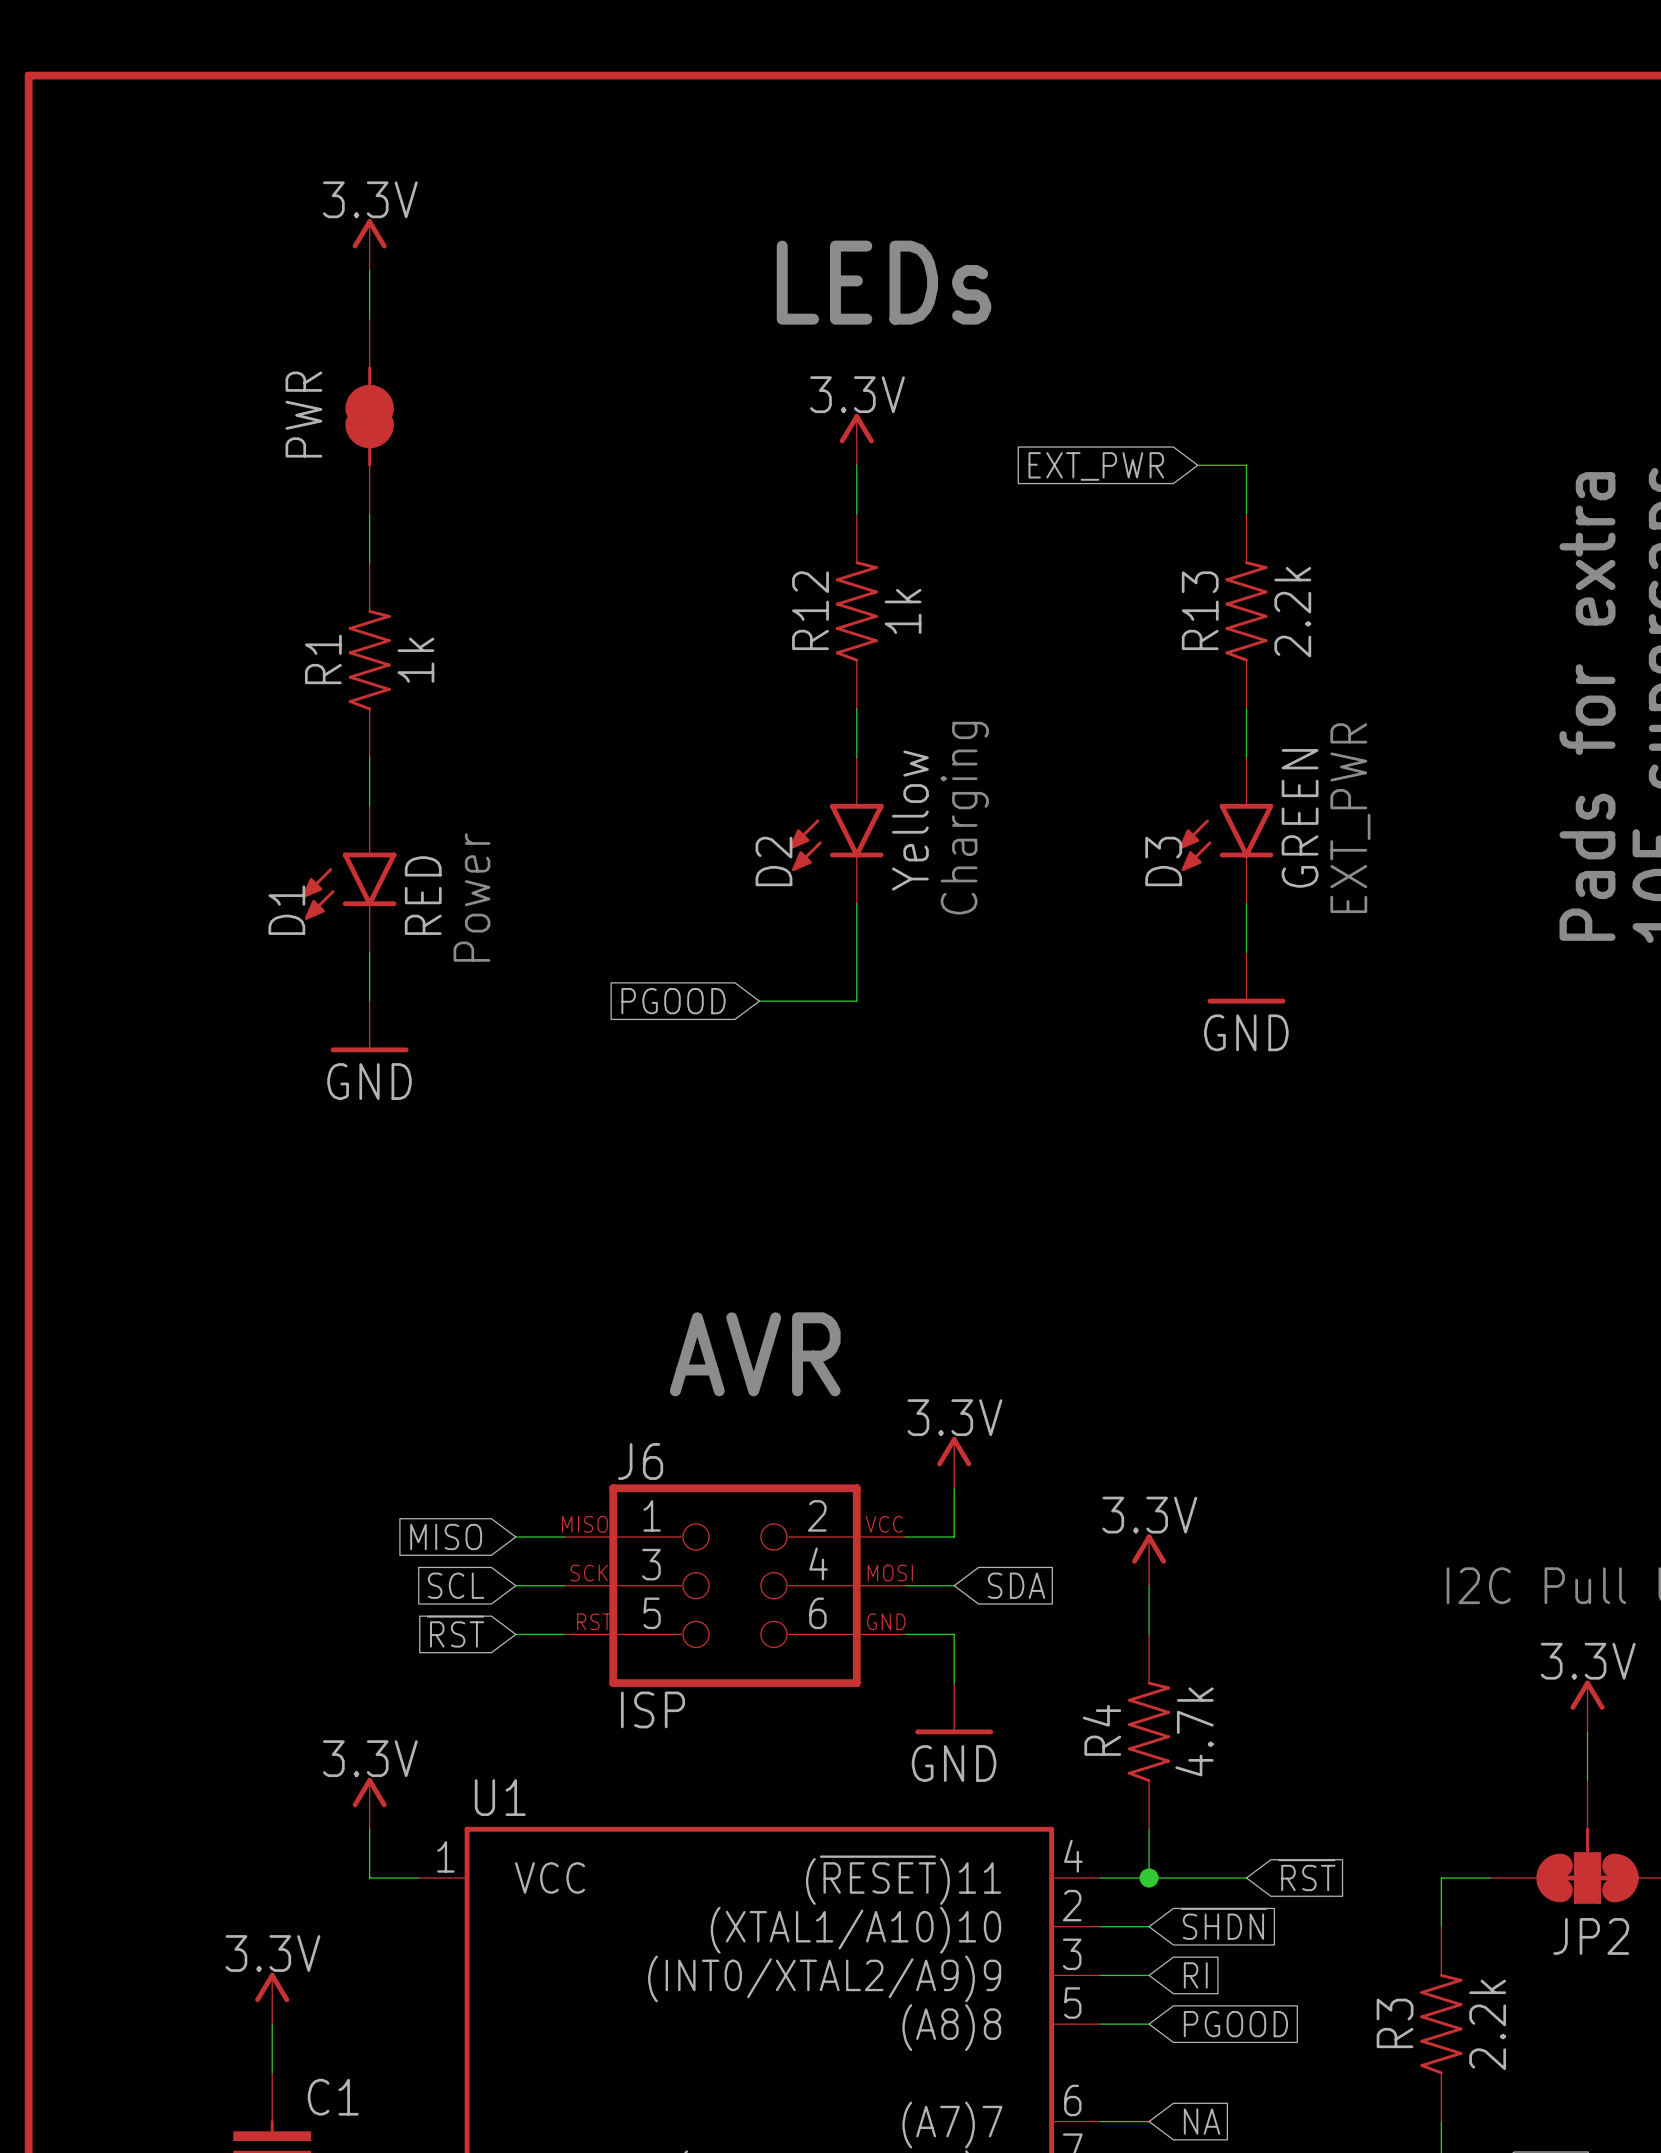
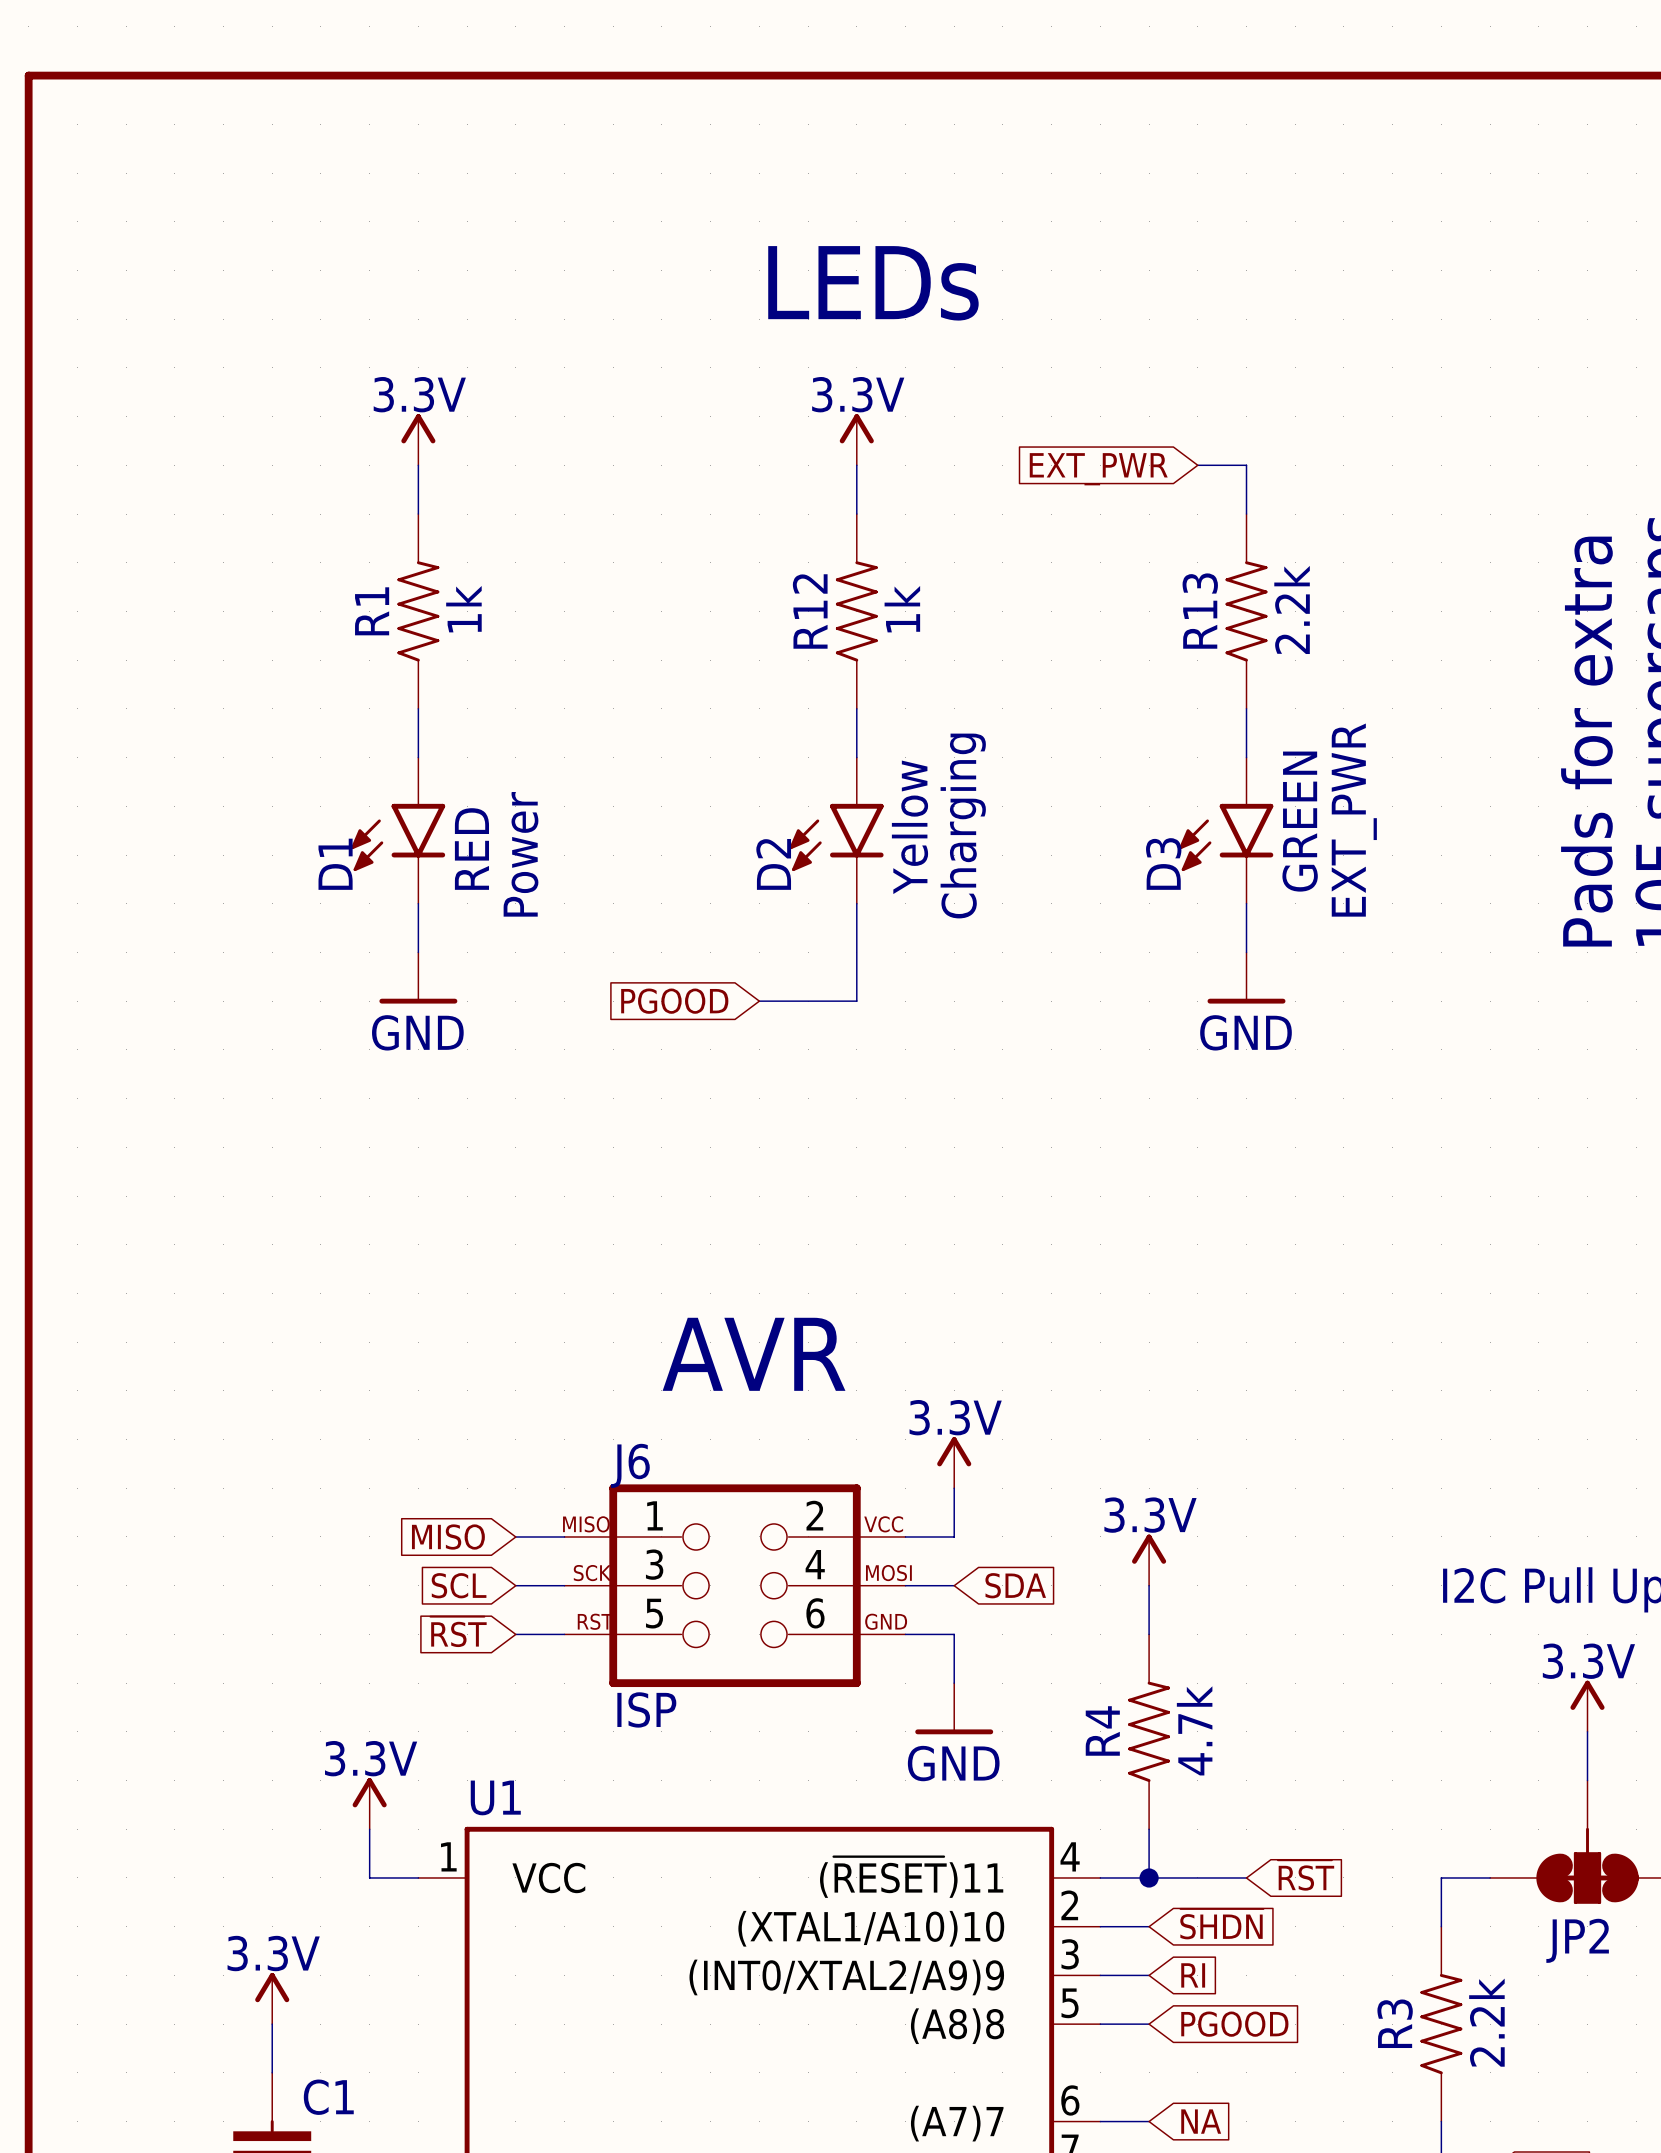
power symbol position: 3.3V (369, 244) -> 3.3V (418, 439)
wire: (369, 270) (369, 319) -> none
PWR: (369, 416) -> none
wire: (369, 514) (369, 562) -> (418, 465) (418, 514)
R1 position: (369, 660) -> (418, 611)
wire: (369, 757) (369, 806) -> (418, 708) (418, 757)
D1 position: (349, 879) -> (398, 830)
text position: Power (471, 897) -> Power (521, 854)
wire: (369, 952) (369, 1001) -> (418, 903) (418, 952)
power symbol position: GND (369, 1026) -> GND (418, 978)

